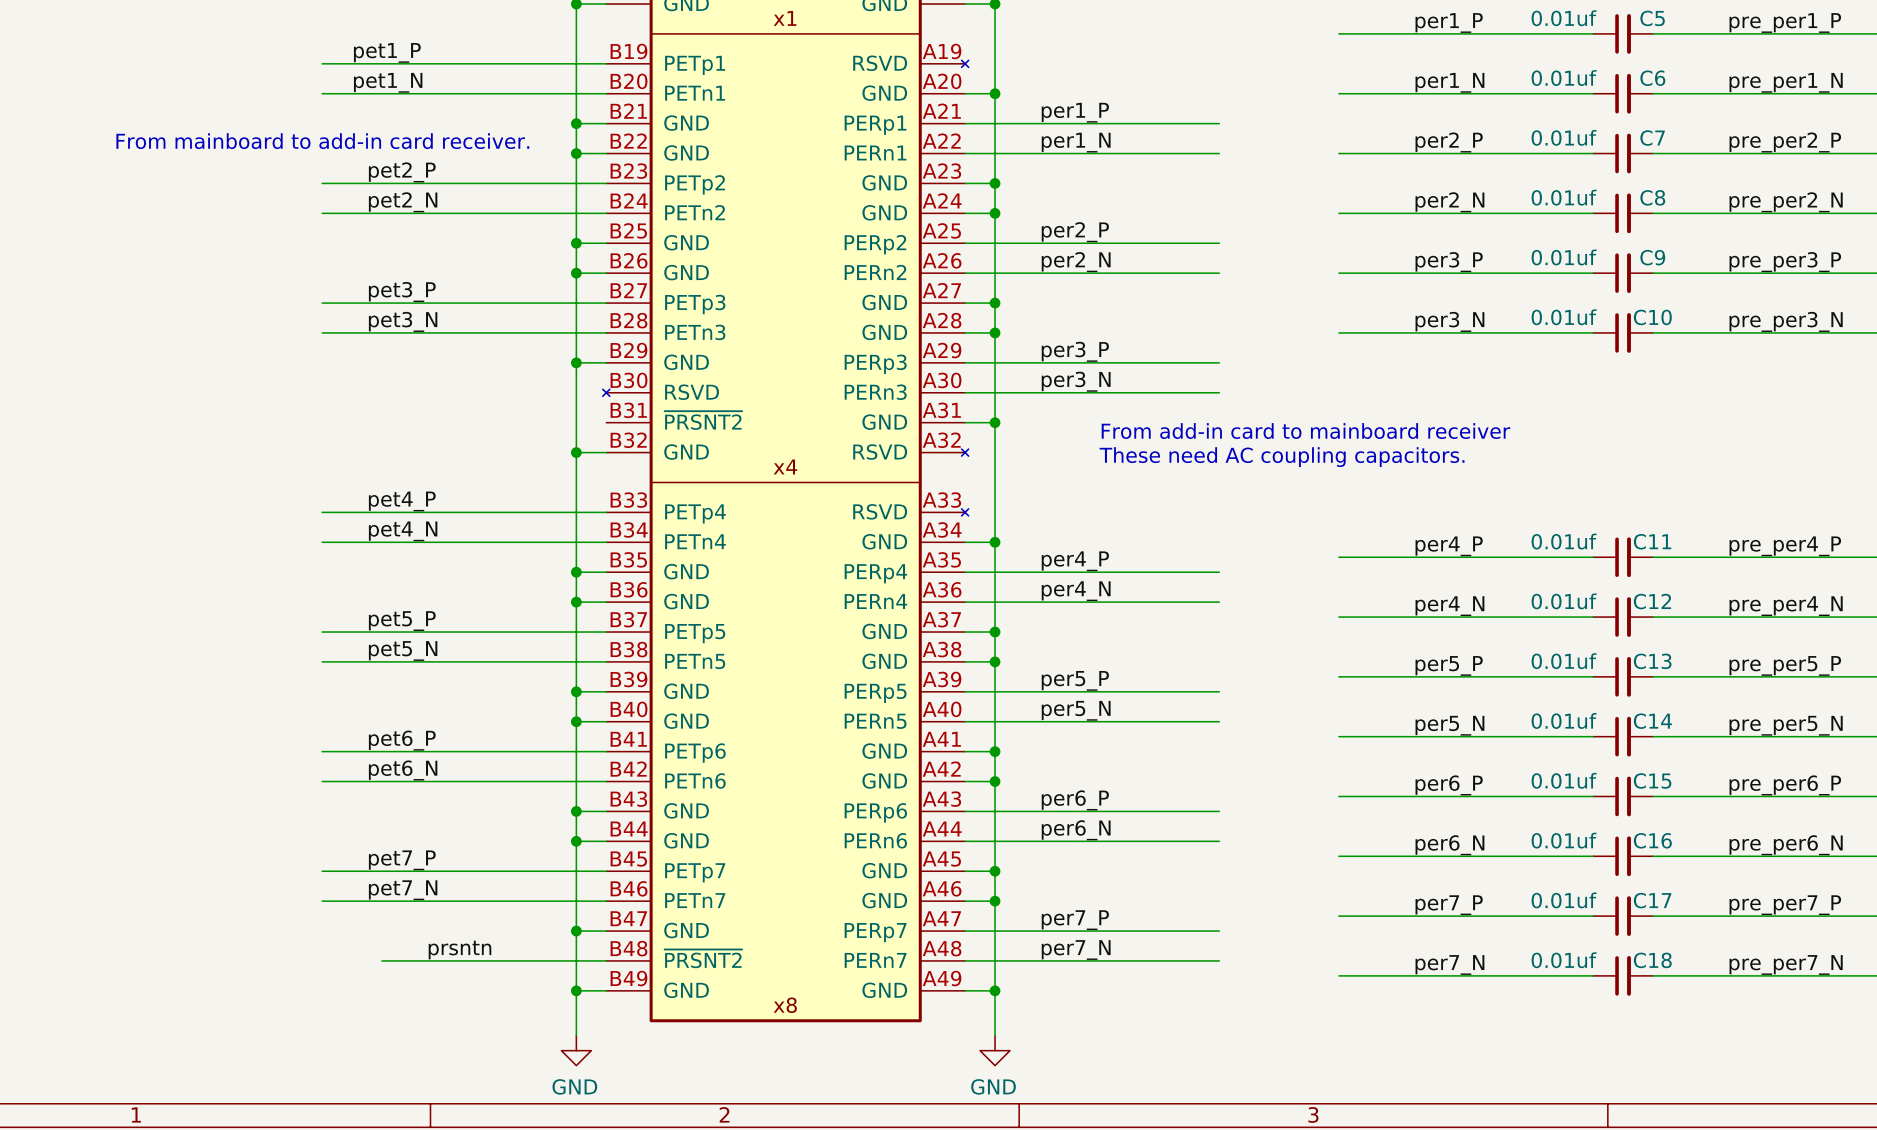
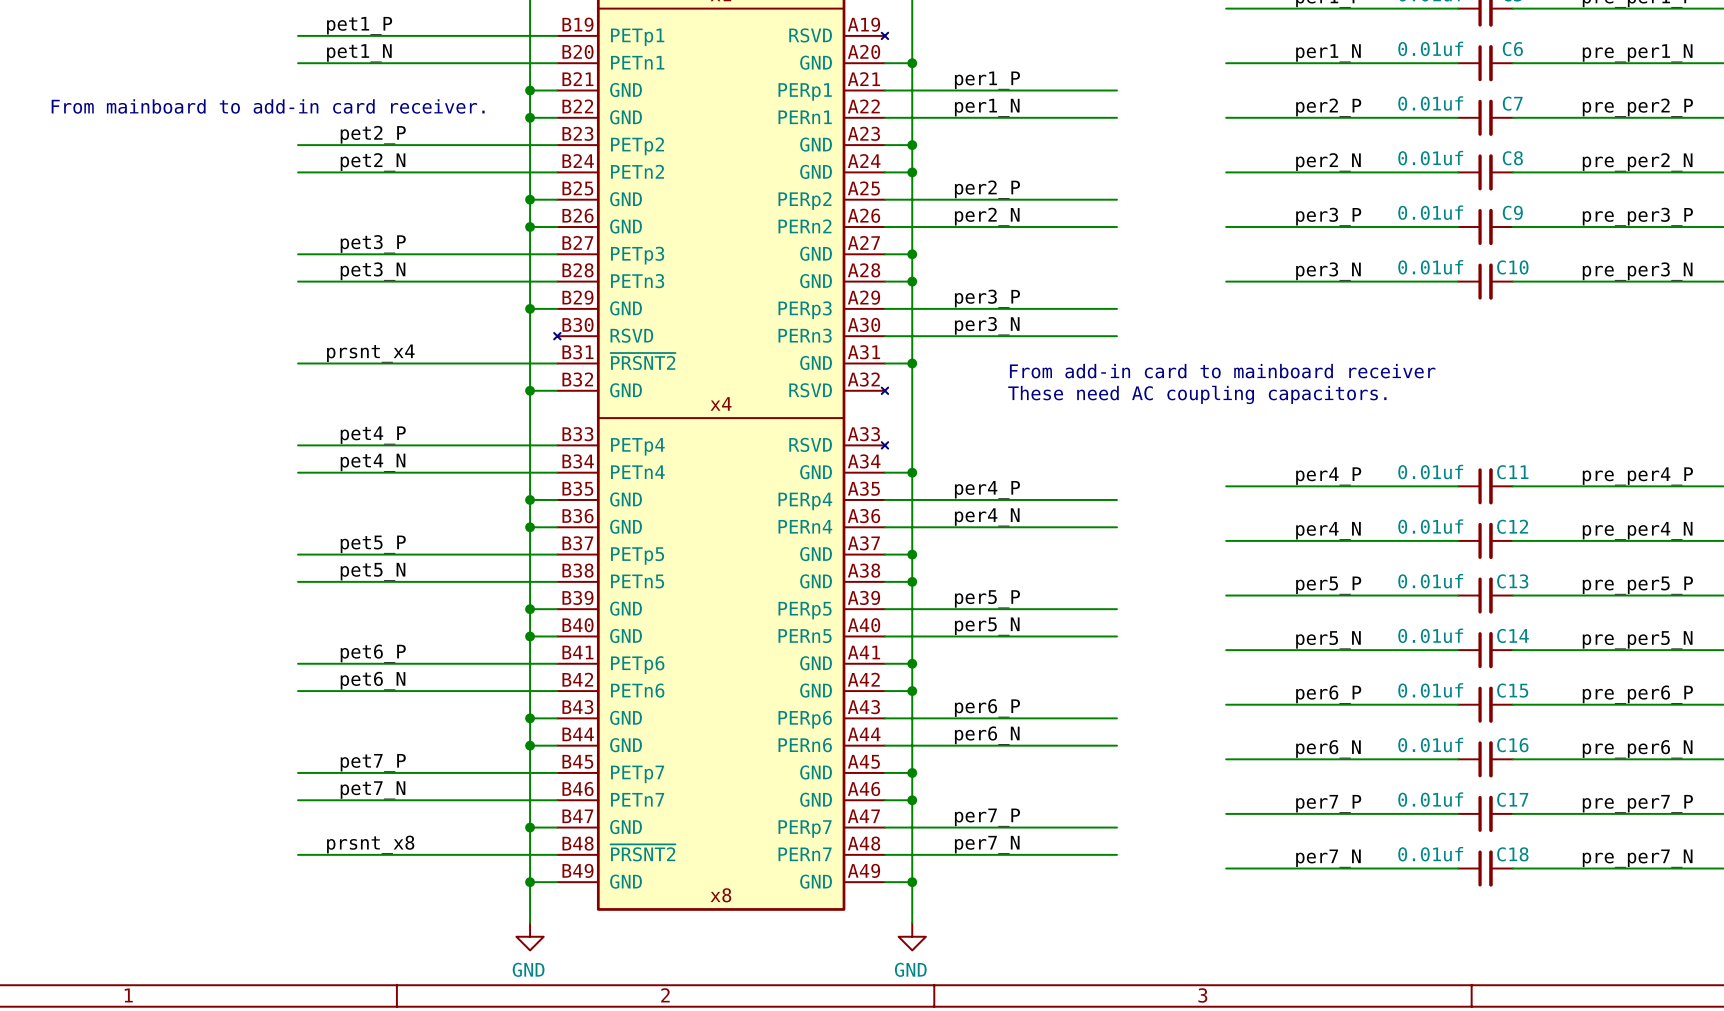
label: none -> prsnt_x4 (370, 353)
wire: none -> (298, 363) (557, 363)
label: prsntn (459, 950) -> prsnt_x8 (370, 844)
wire: none -> (298, 854) (352, 854)

